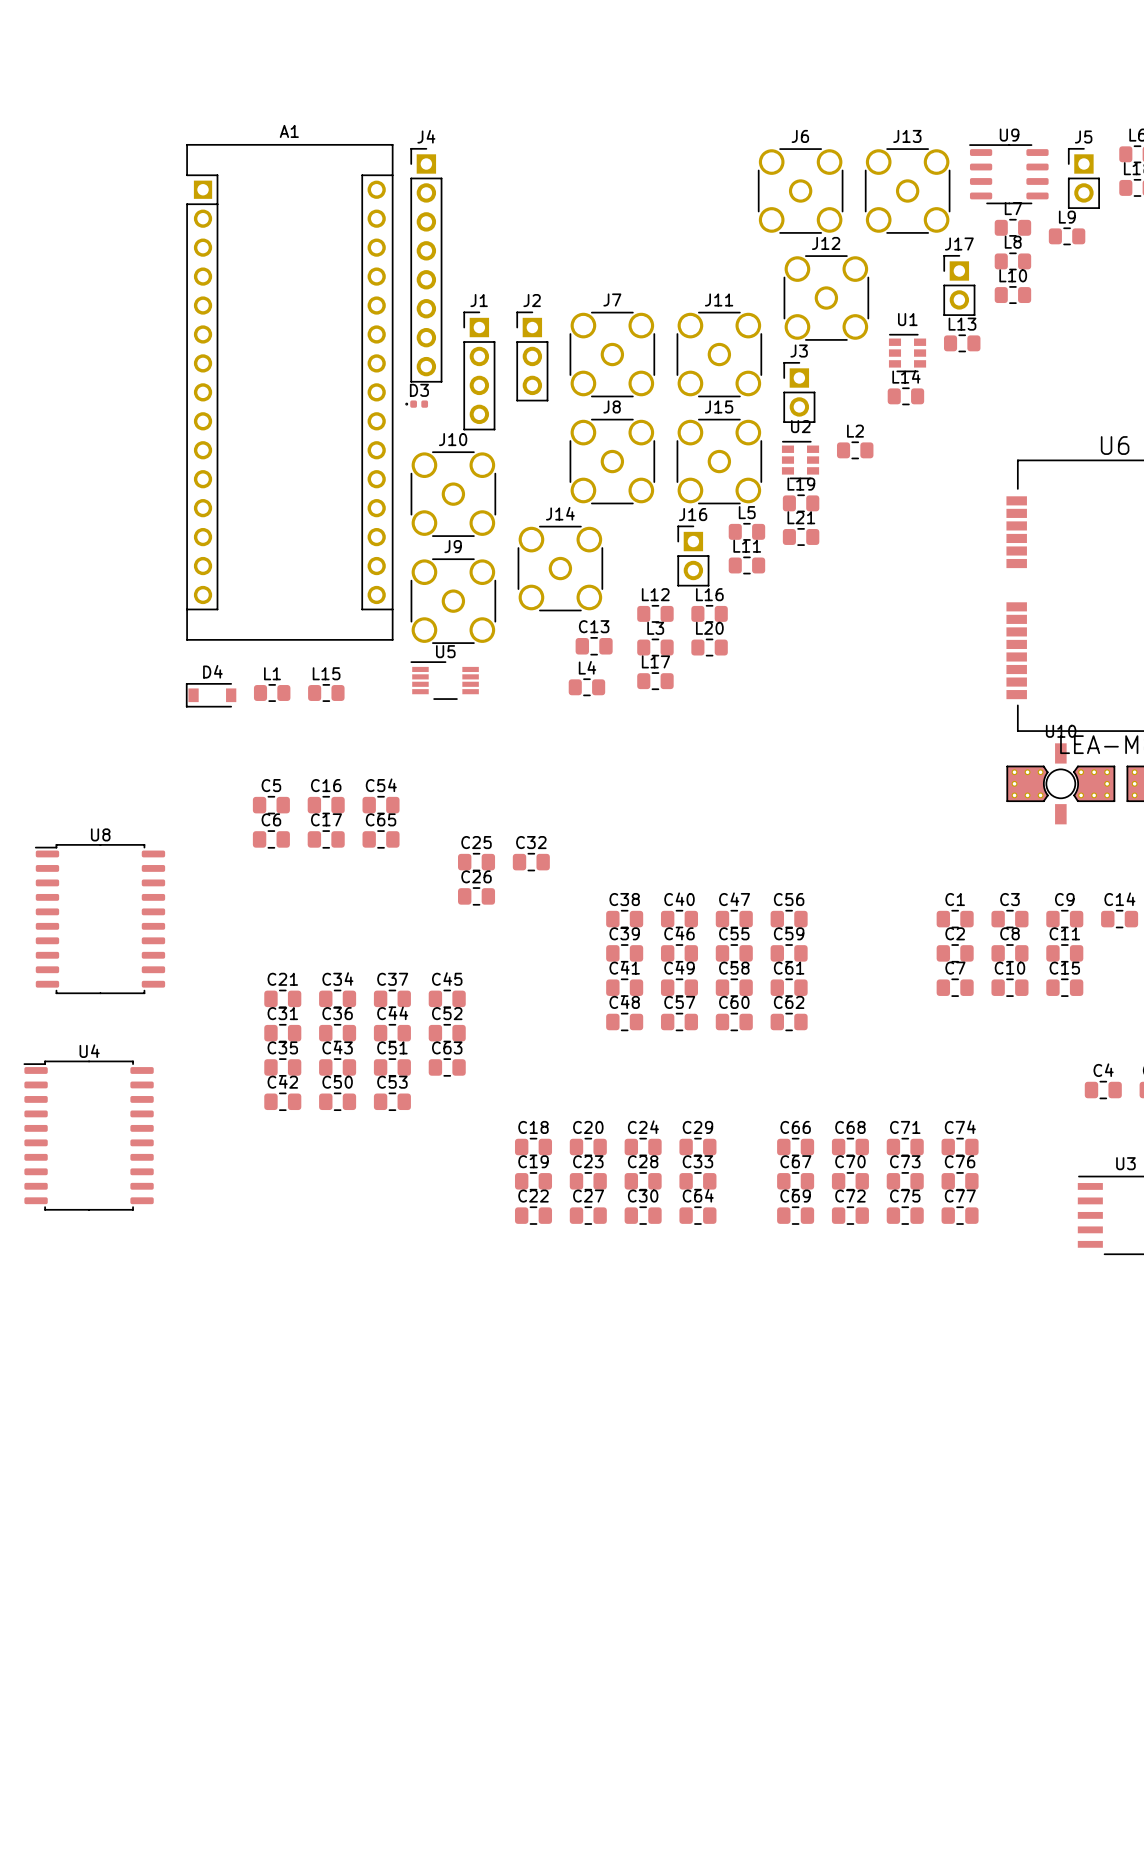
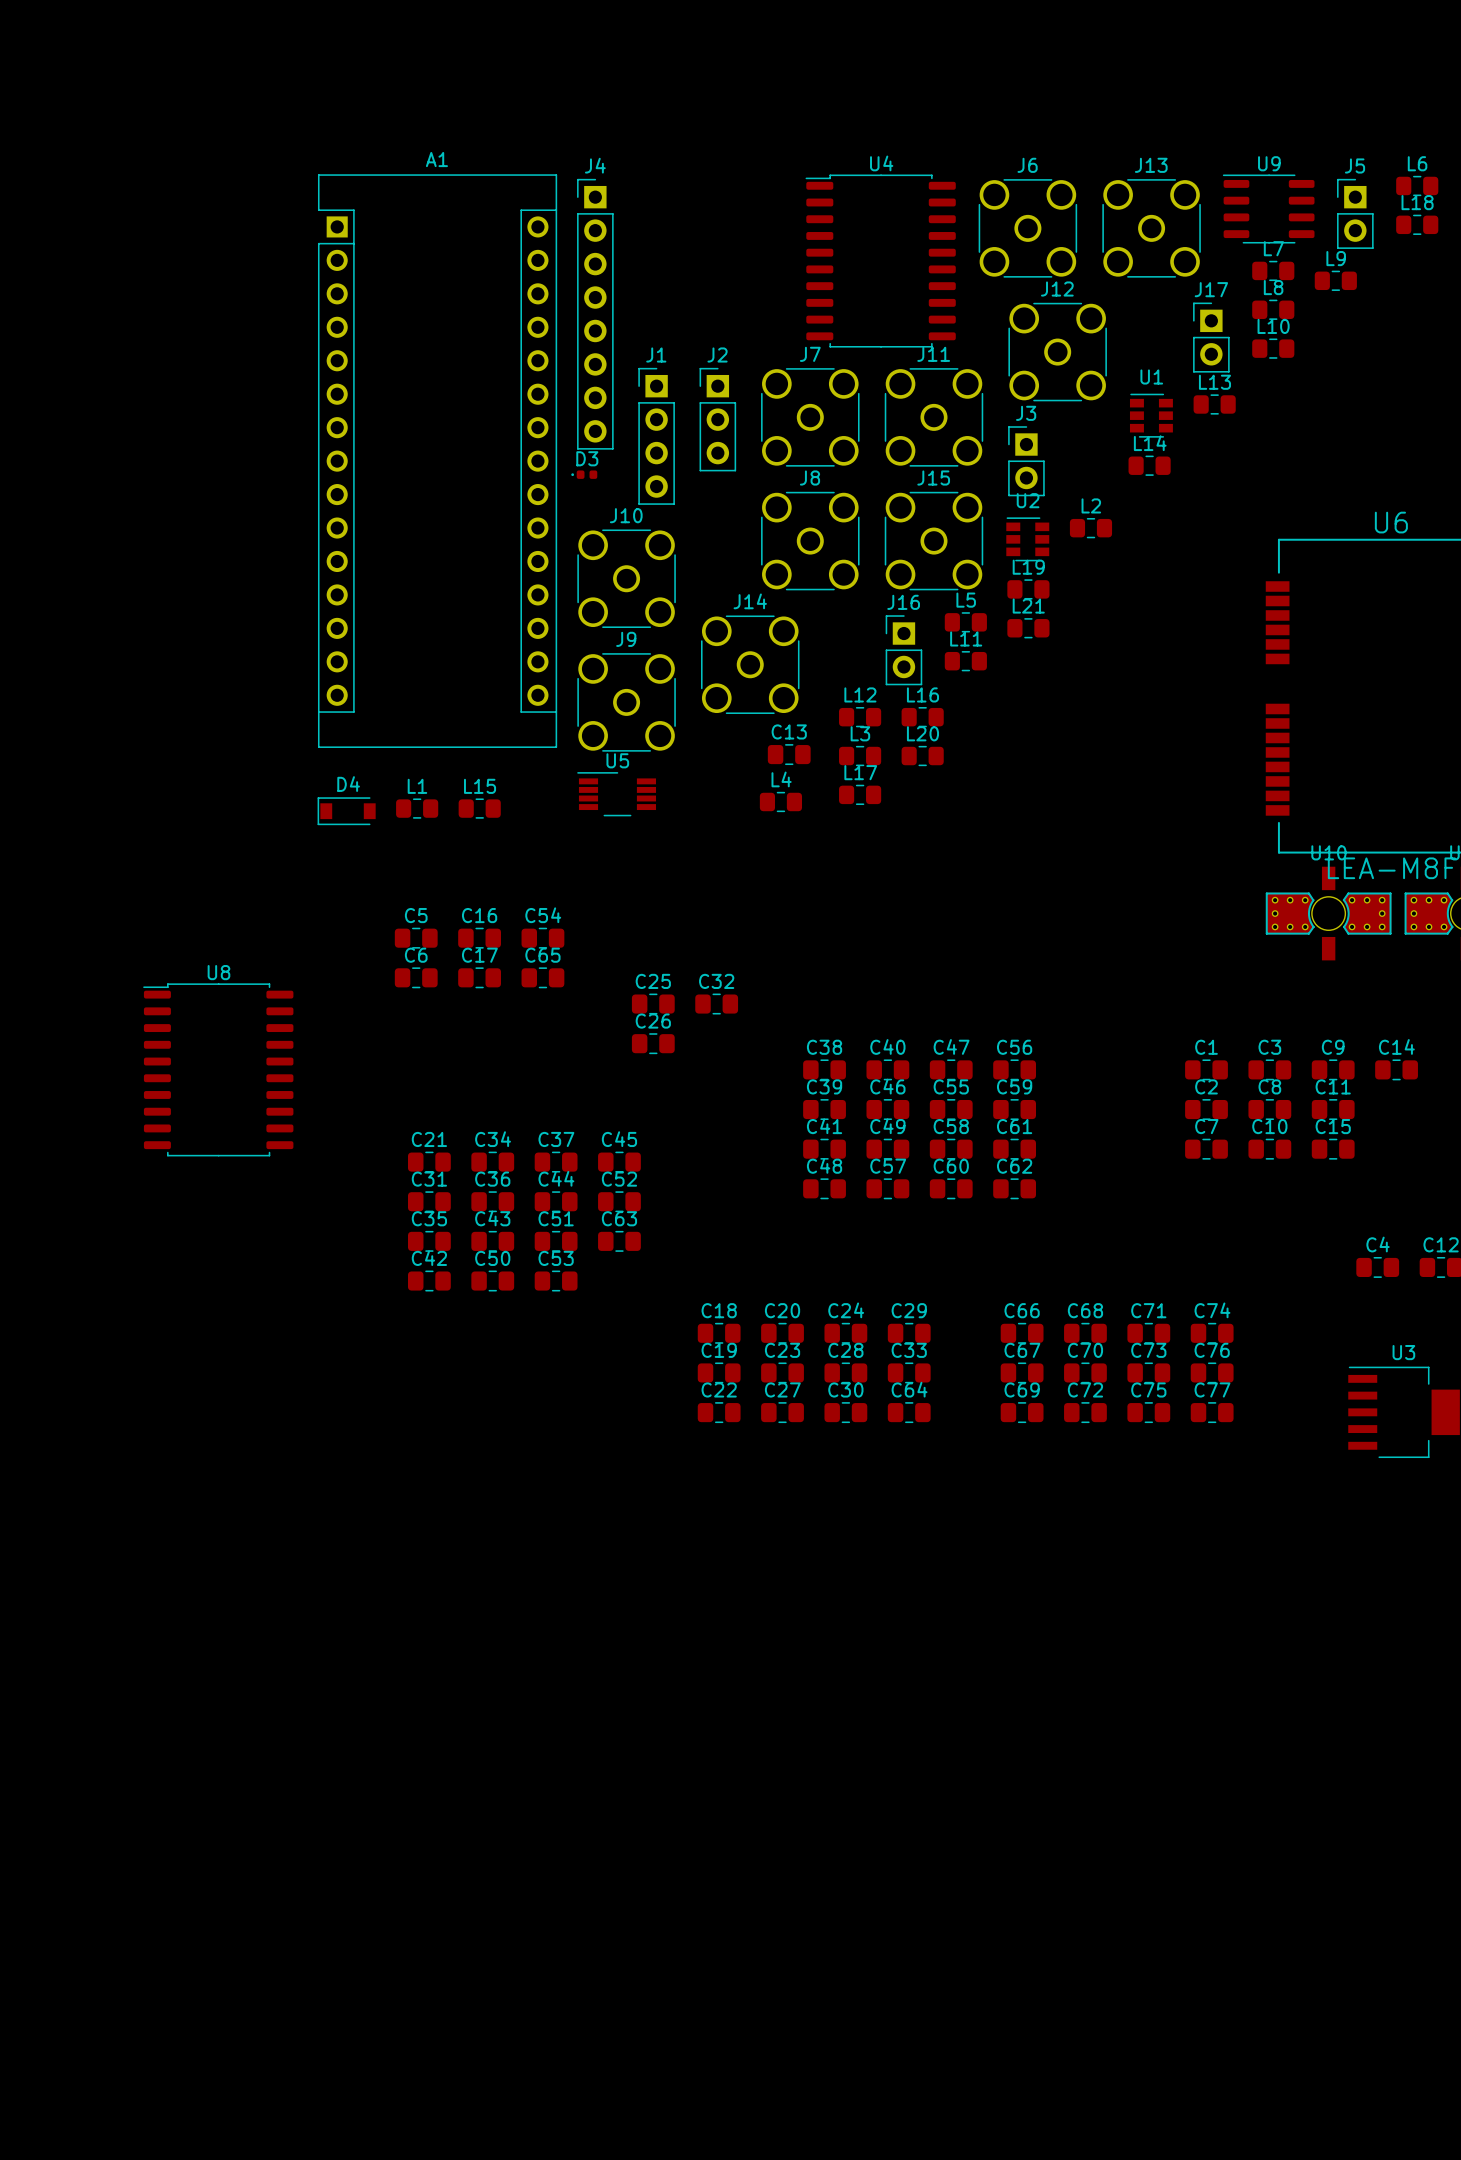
U4 position: (88, 1135) -> (880, 261)

